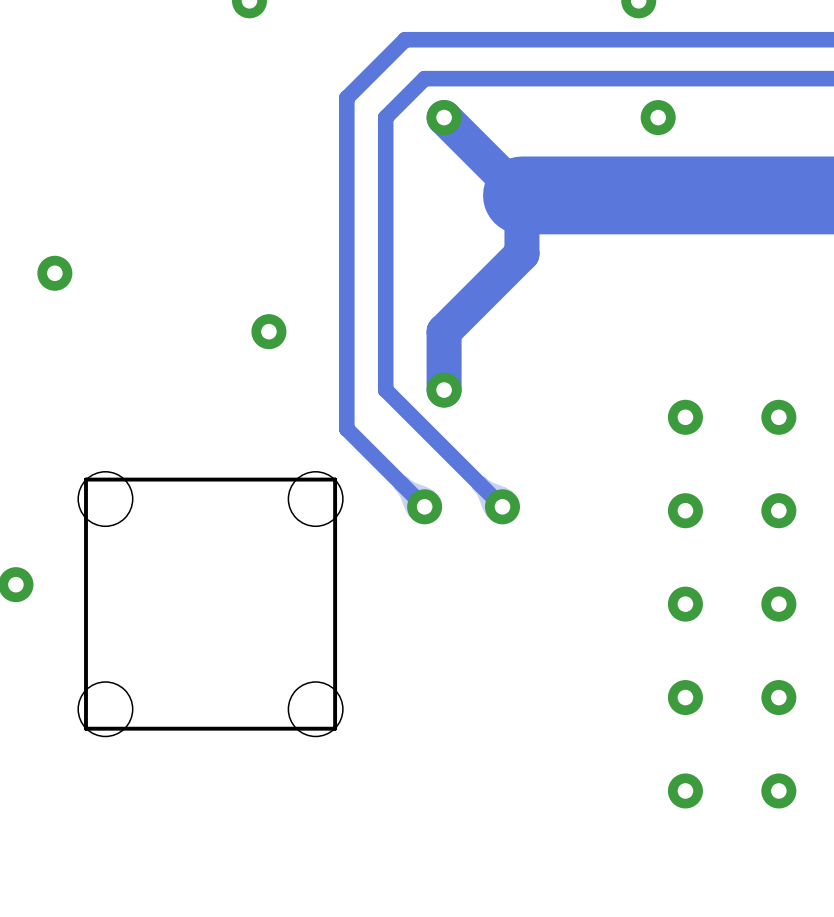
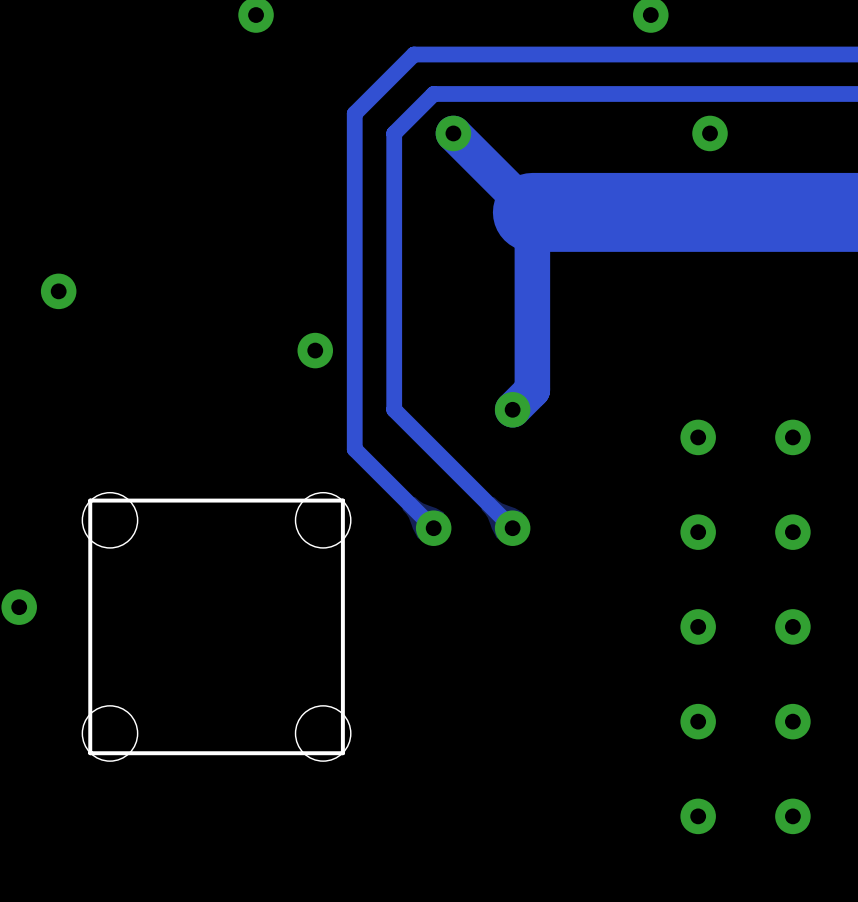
via position: (658, 117) -> (710, 133)
track: (521, 253) (444, 331) (444, 390) -> (532, 271) (532, 390) (512, 409)
via position: (268, 331) -> (315, 350)
via position: (444, 390) -> (512, 409)

